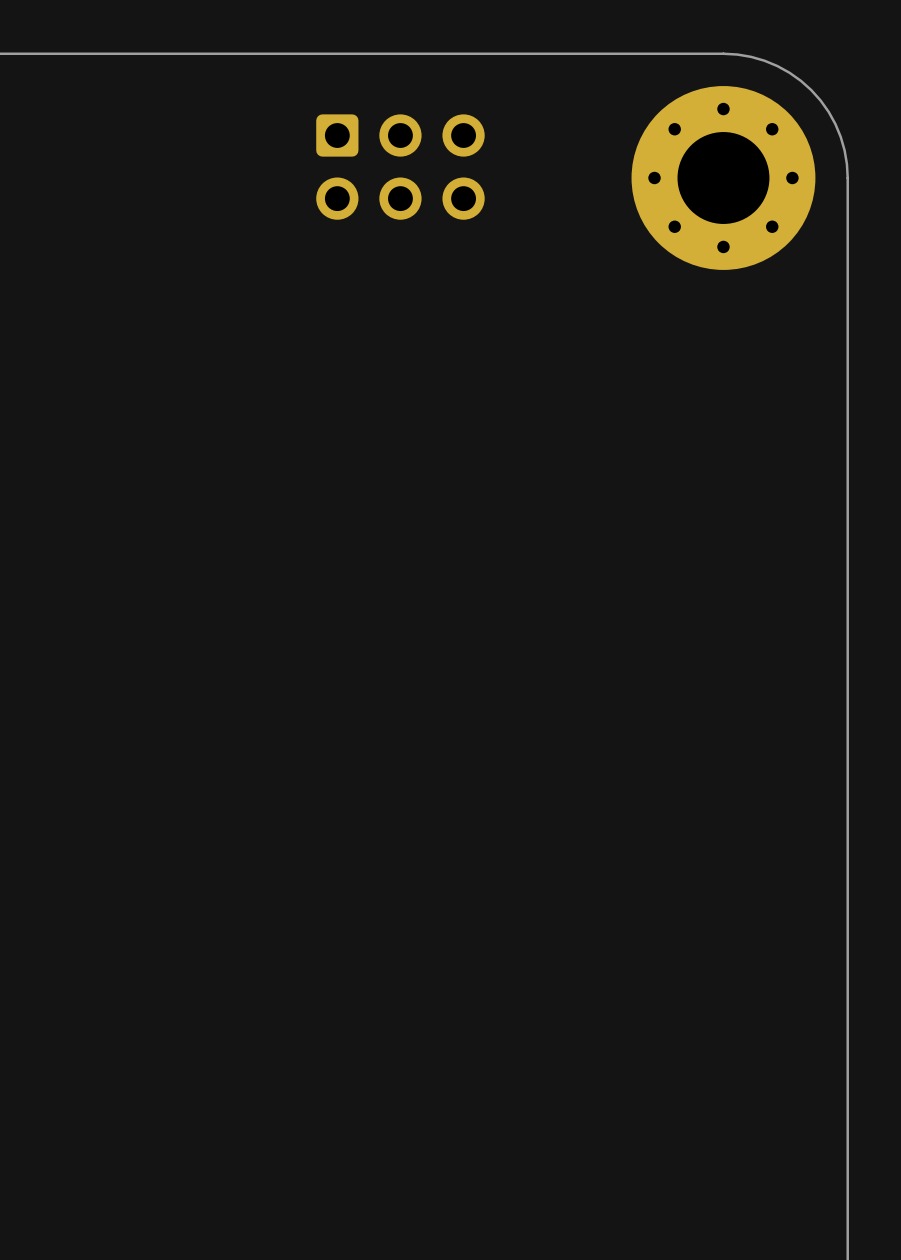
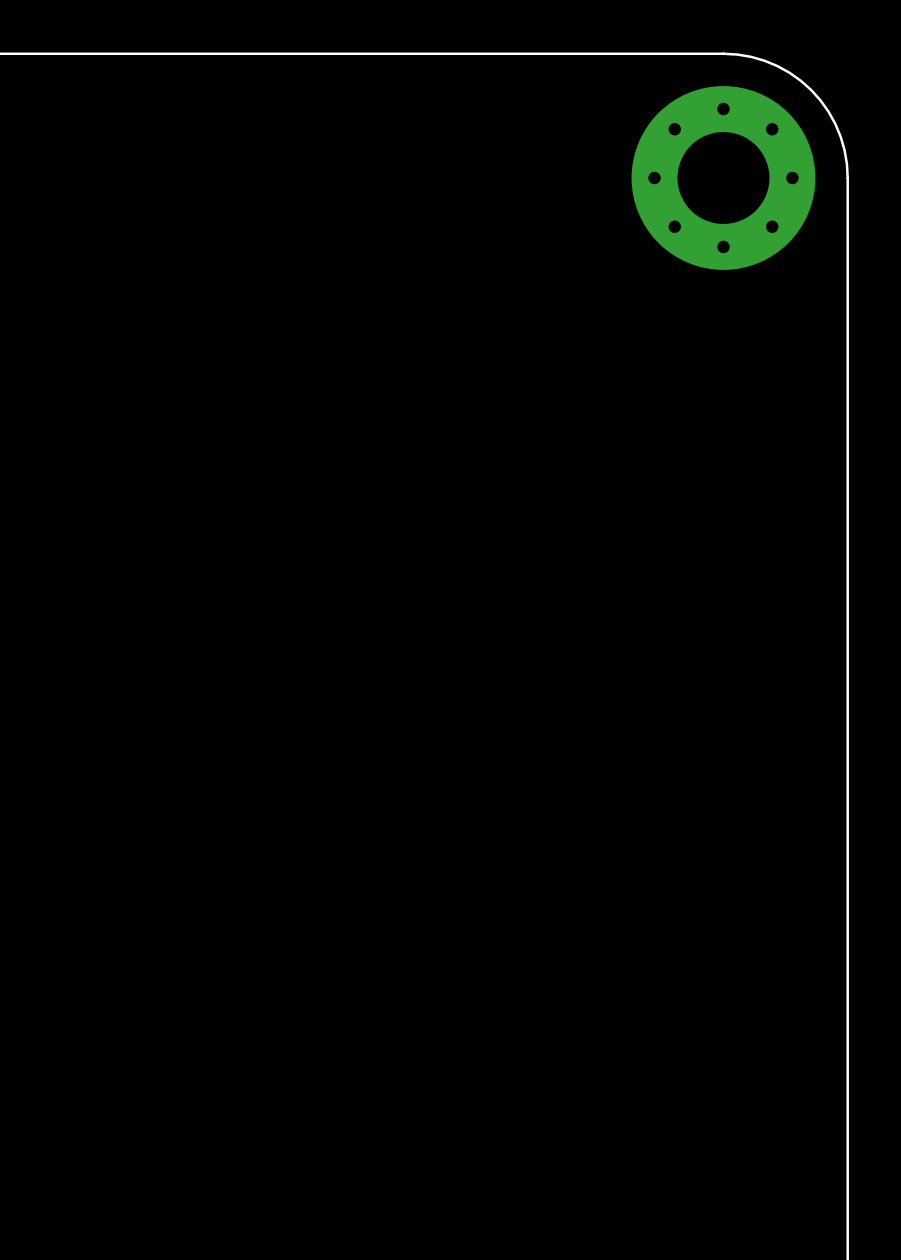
part: (400, 167) -> none

